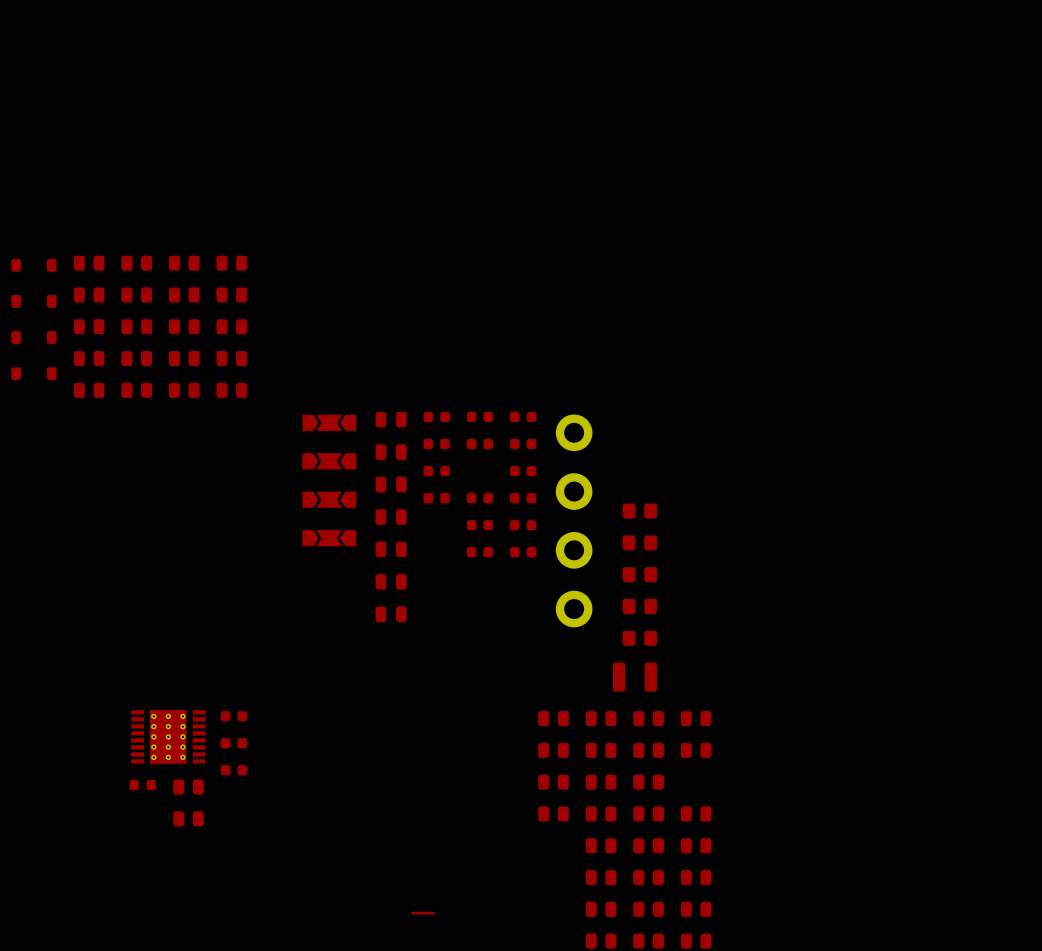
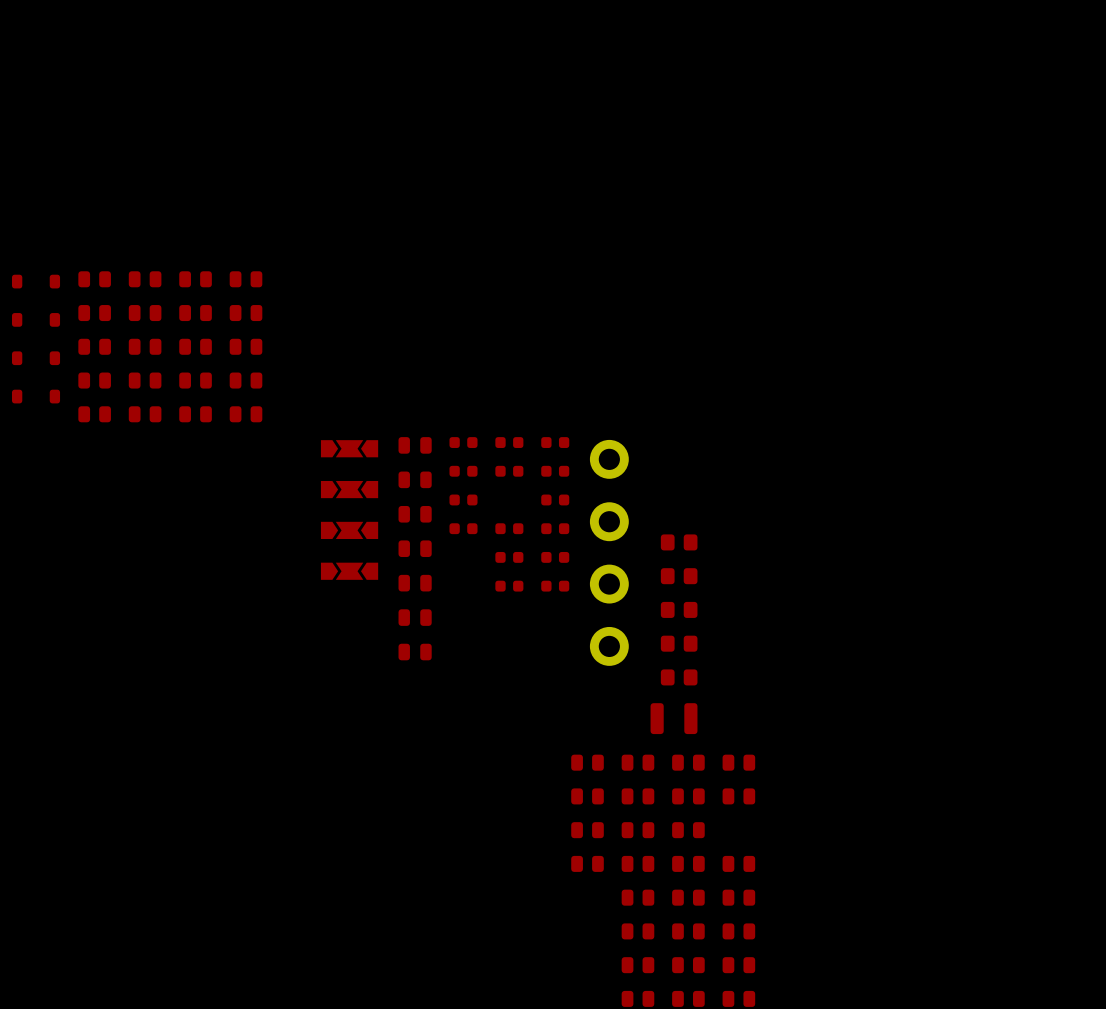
part: (233, 716) -> none
part: (168, 736) -> none
part: (233, 743) -> none
part: (233, 770) -> none
part: (142, 785) -> none
part: (188, 787) -> none
part: (188, 818) -> none
top track: (434, 913) (412, 913) -> none

